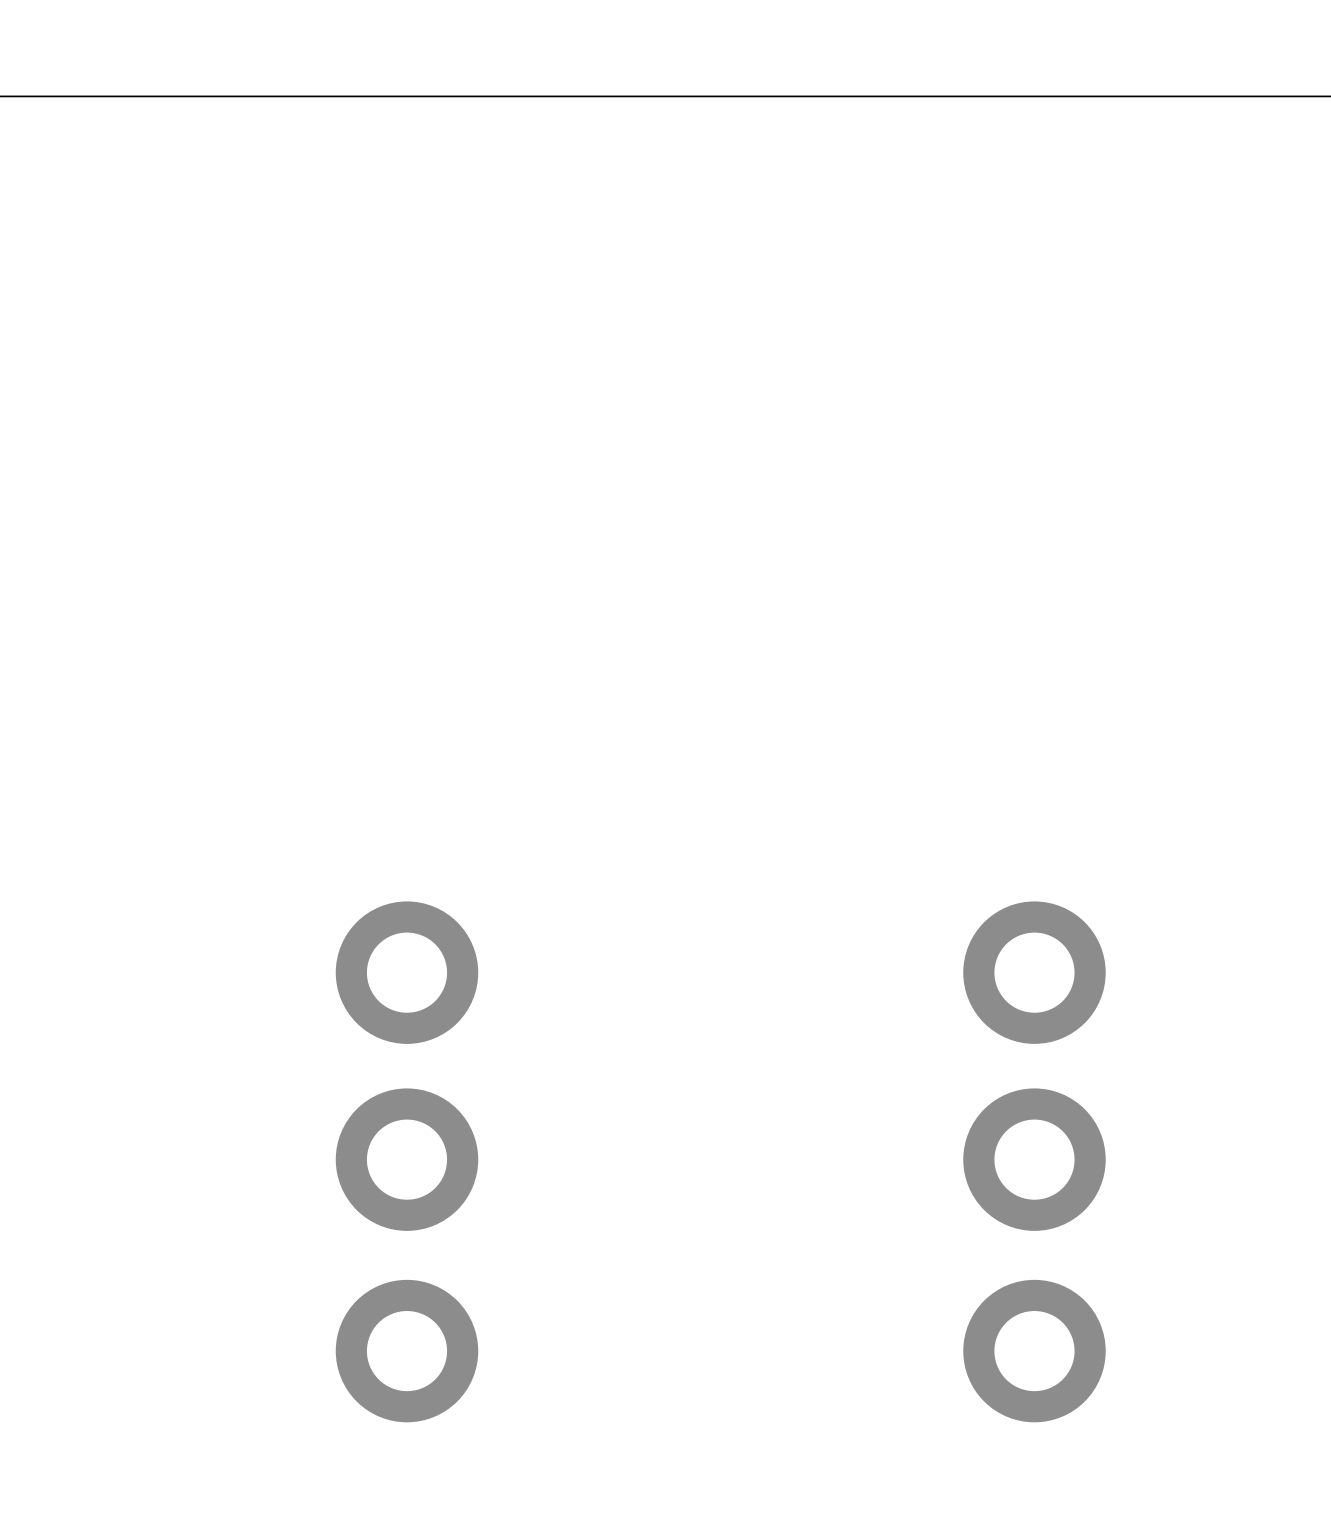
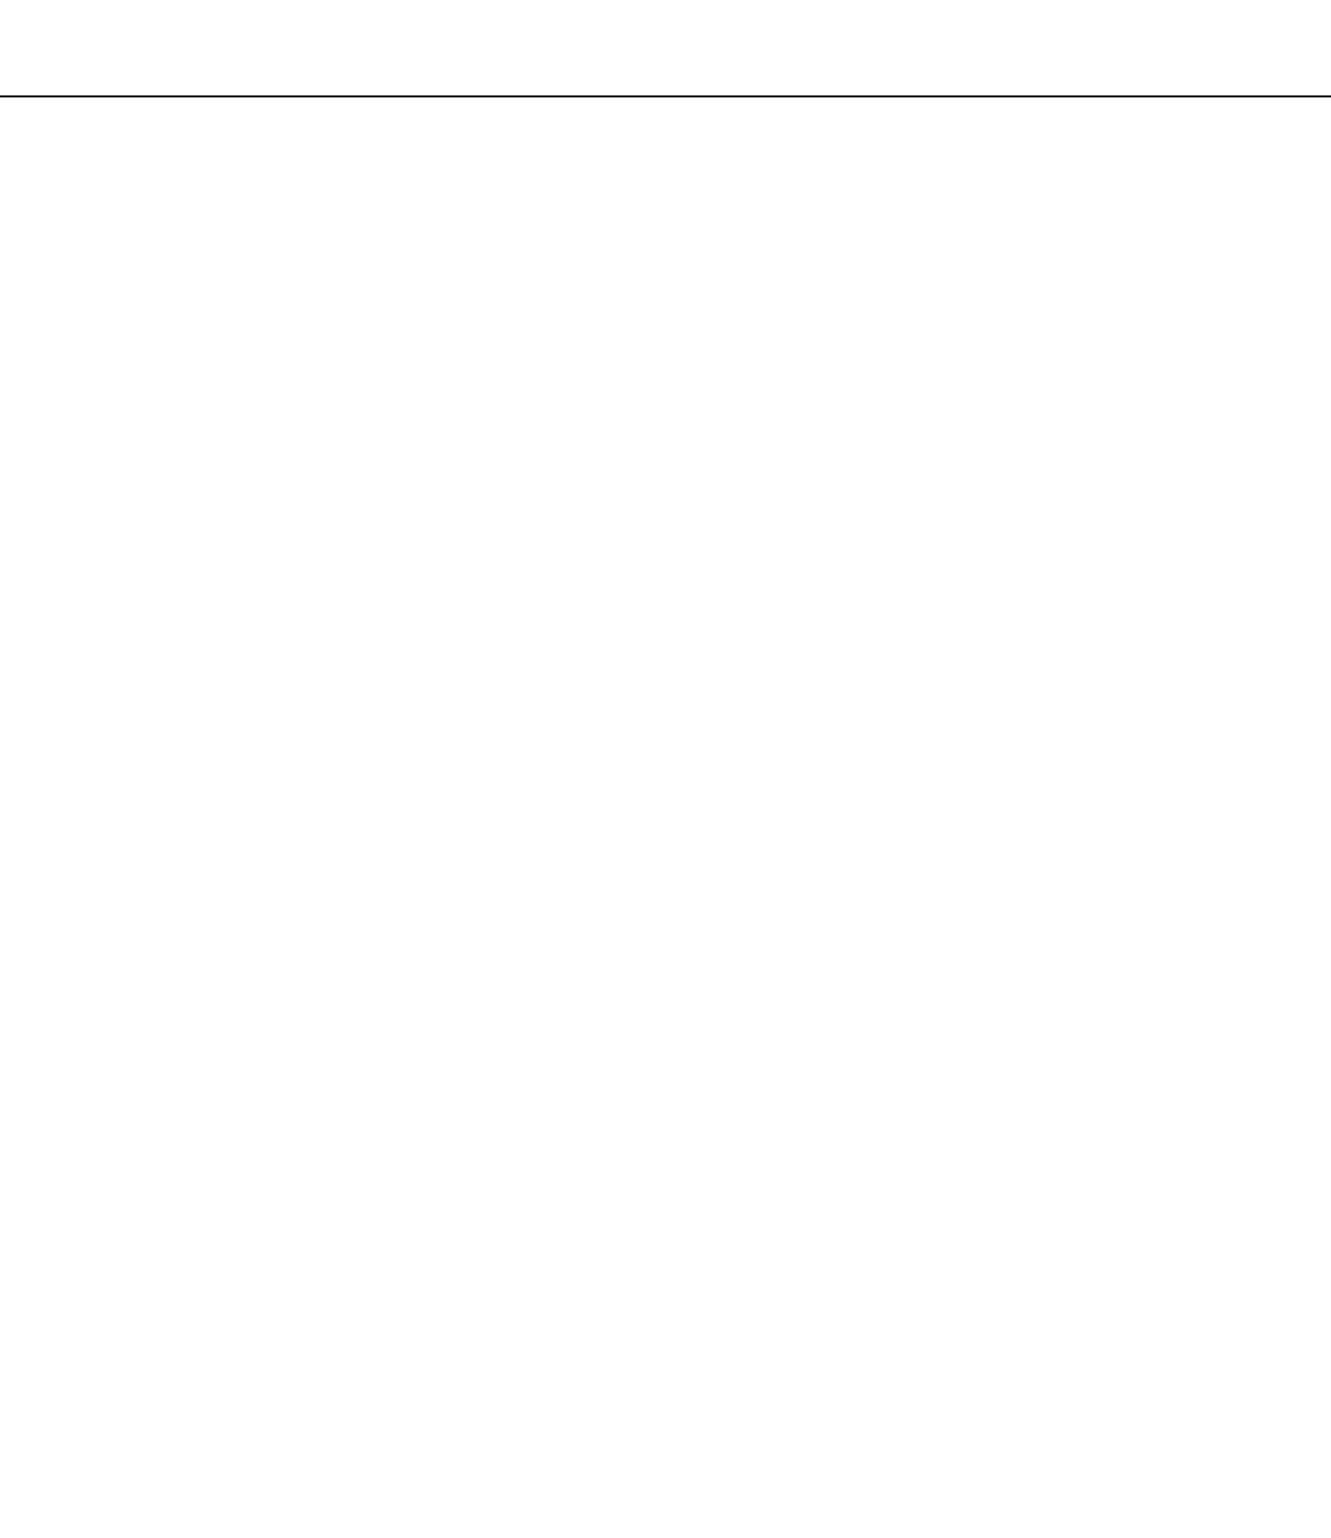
part: (406, 1161) -> none
part: (1034, 1161) -> none

